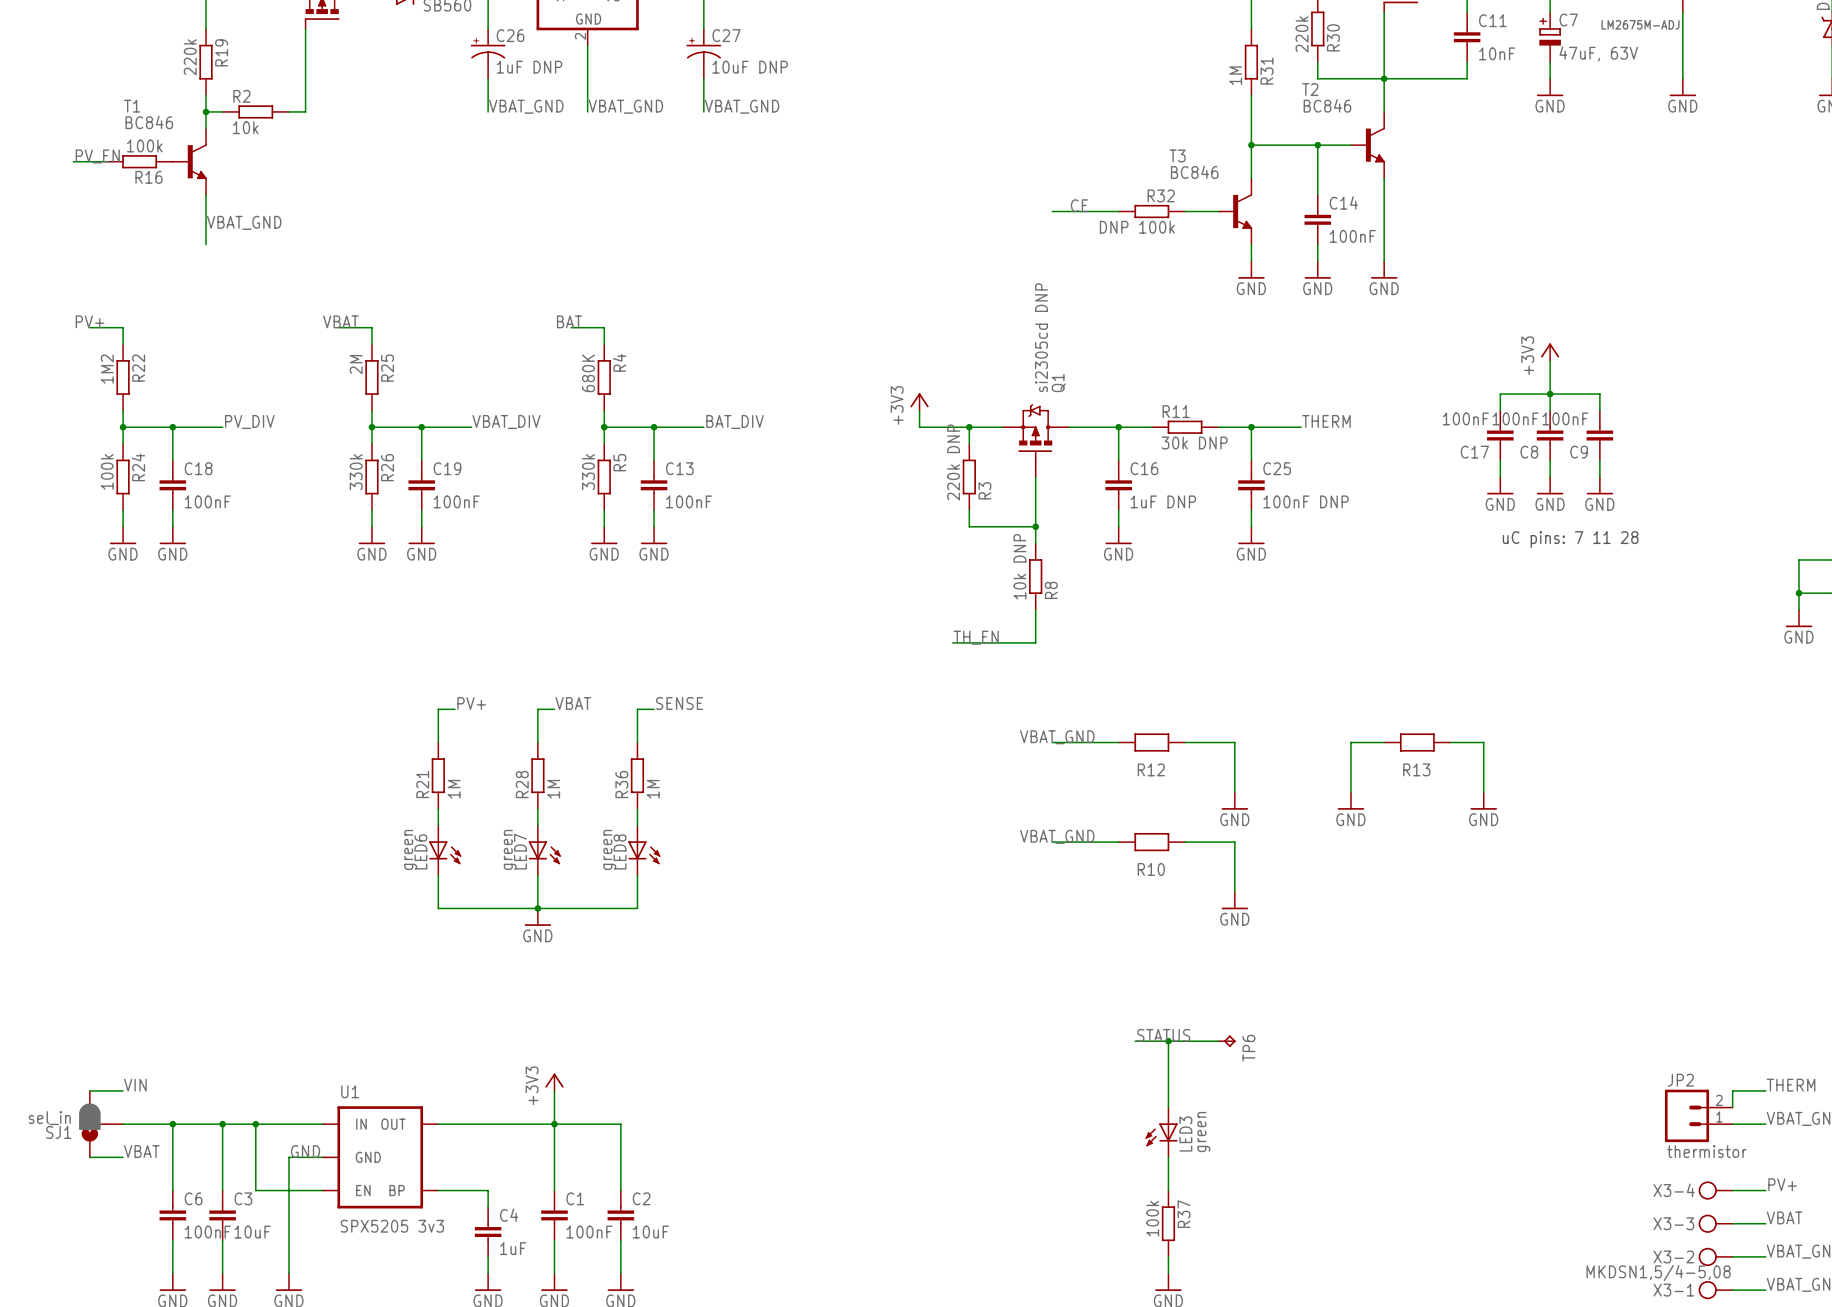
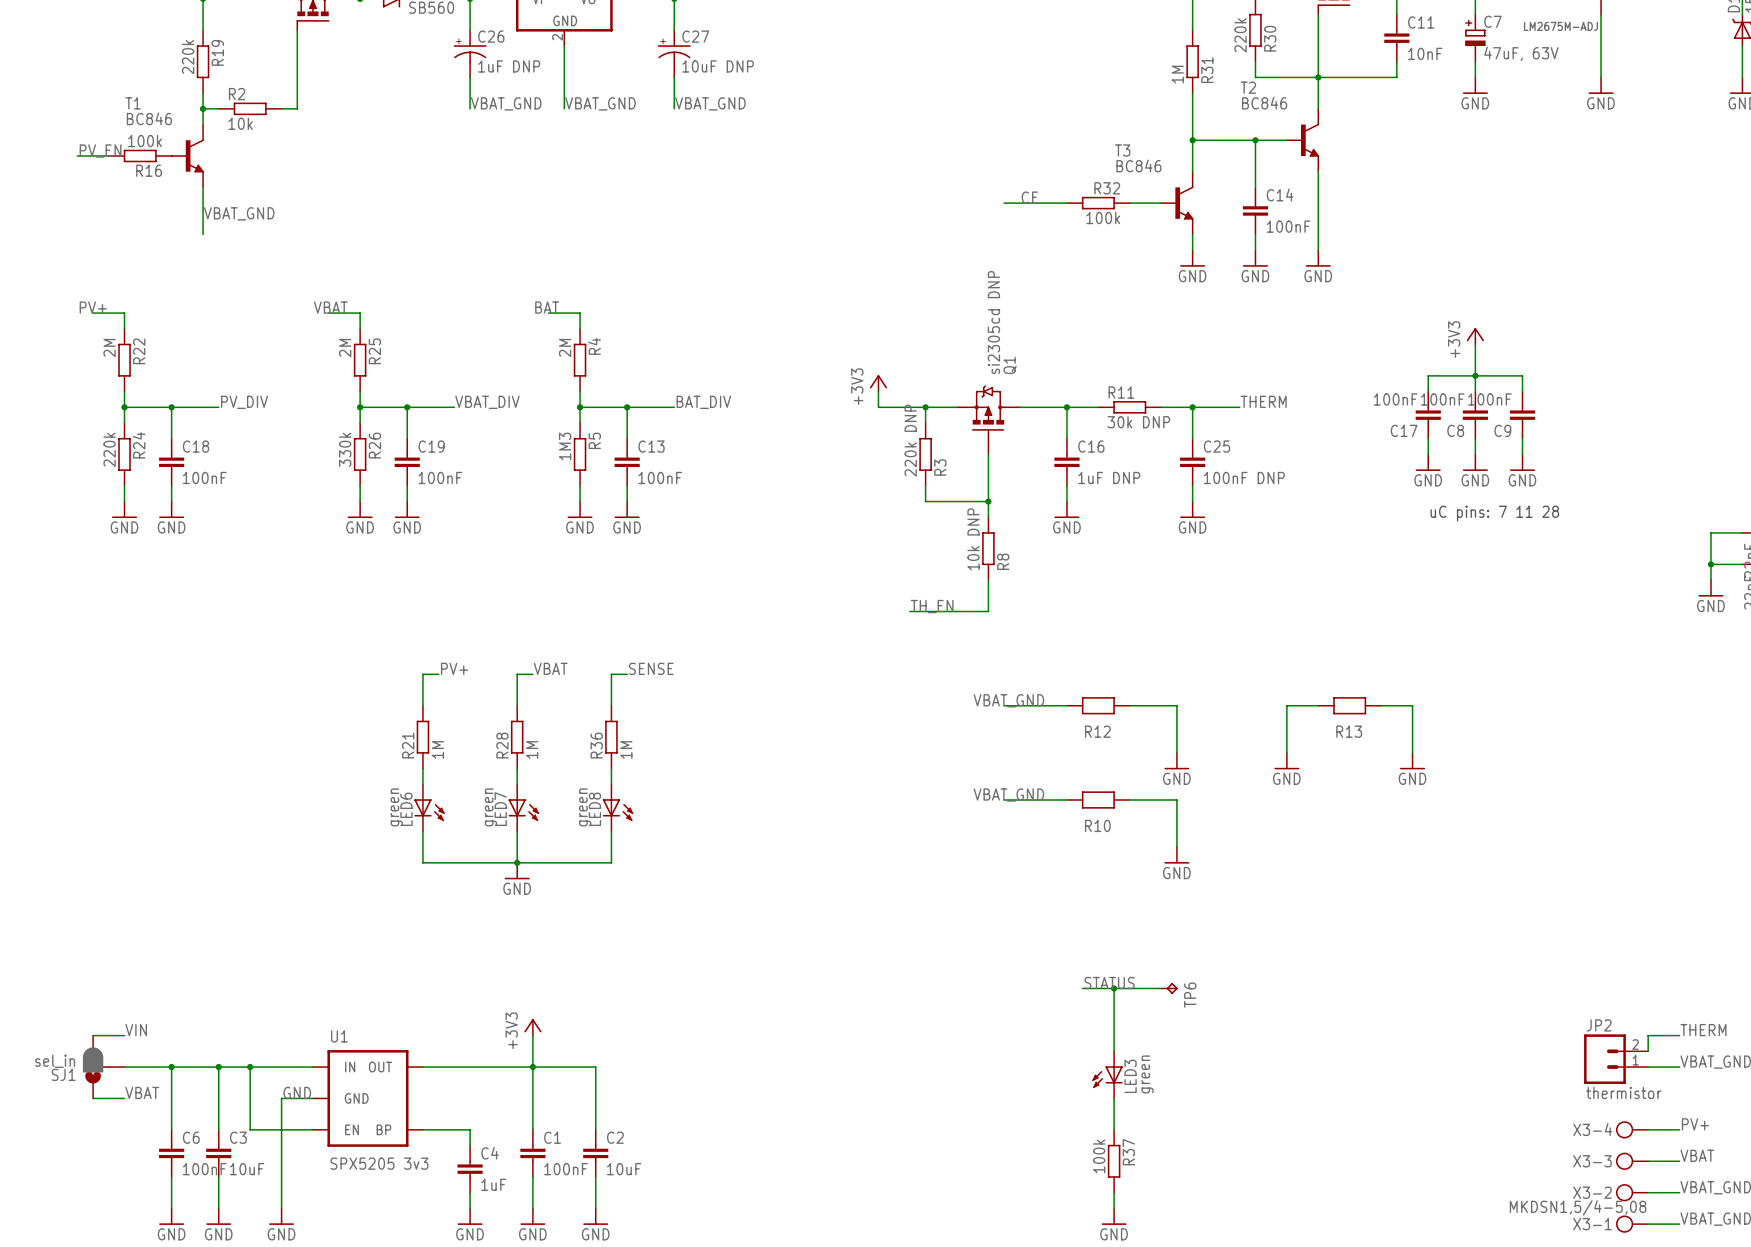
R32 value: DNP 100k (1137, 227) -> 100k (1103, 218)
R22 value: 1M2 (107, 369) -> 2M (109, 348)
R4 value: 680K (588, 373) -> 2M (565, 348)
R24 value: 100k (107, 471) -> 220k (109, 449)
R5 value: 330k (588, 472) -> 1M3 (565, 446)

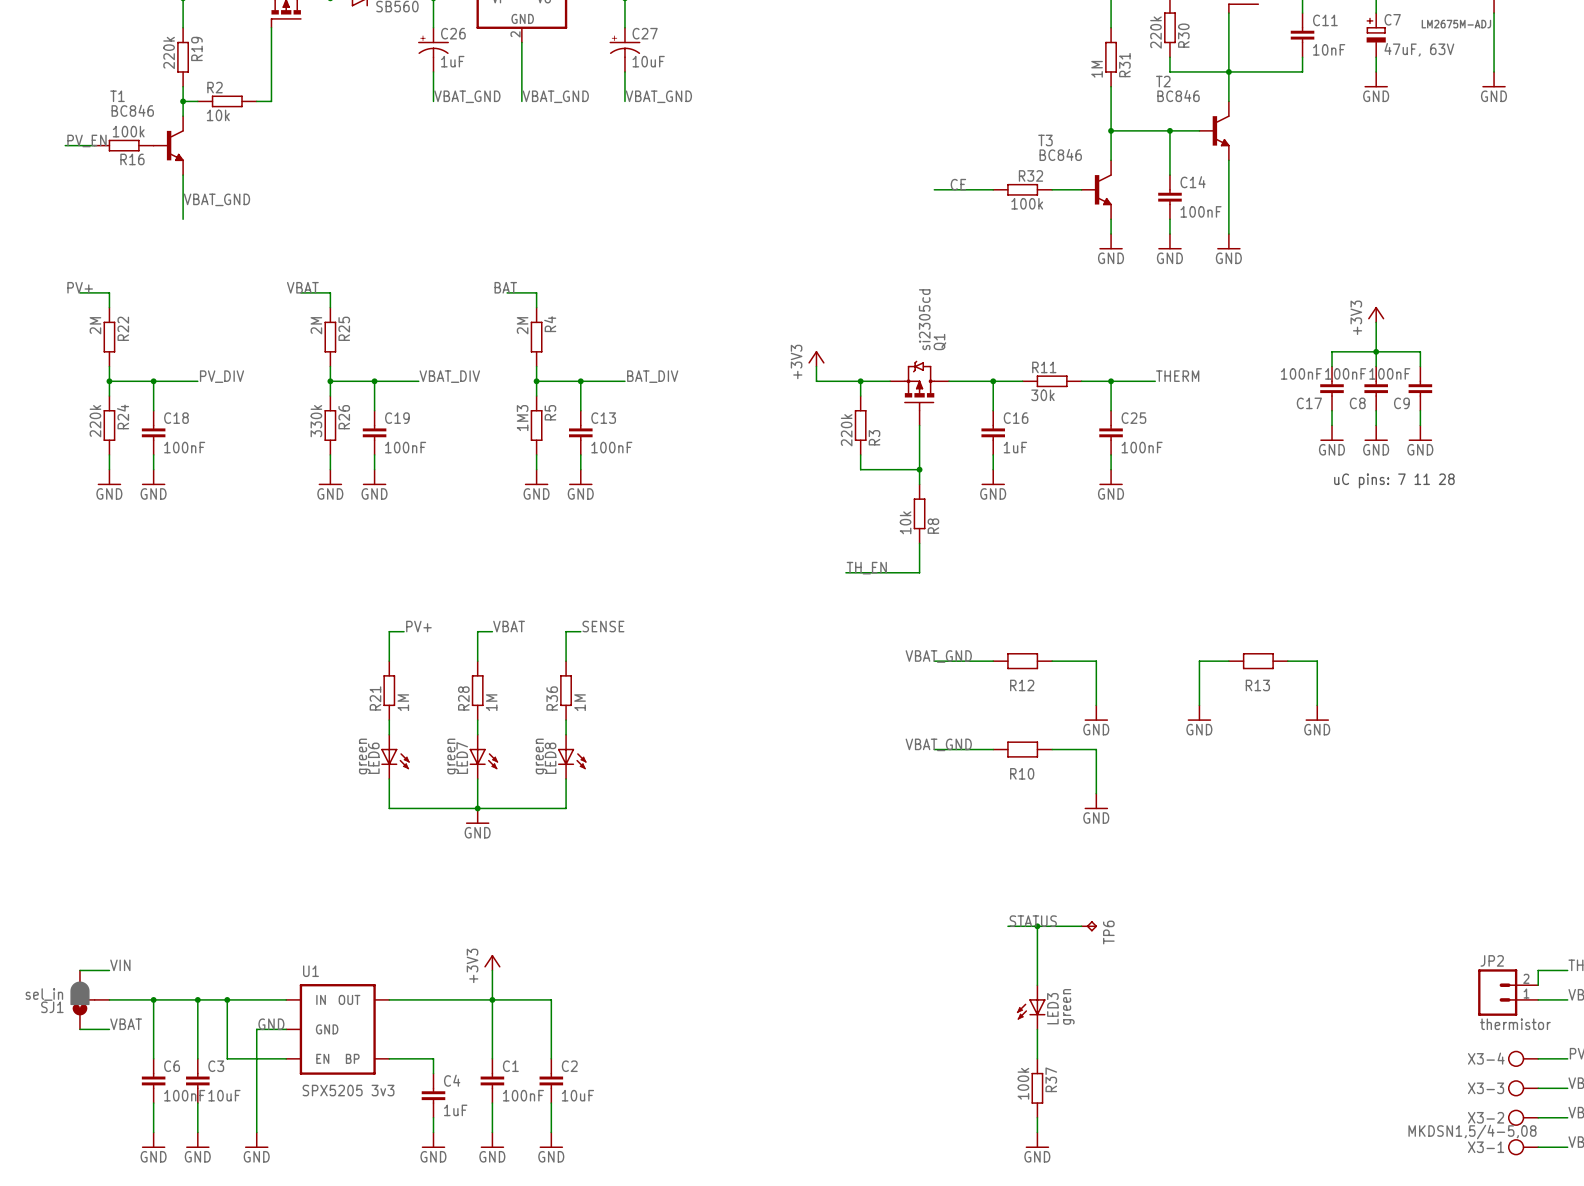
C26 value: 1uF DNP (509, 66) -> 1uF (452, 61)
C27 value: 10uF DNP (718, 66) -> 10uF (648, 61)
Q1 value: si2305cd DNP (993, 322) -> si2305cd (924, 319)
R11 value: 30k DNP (1138, 422) -> 30k (1042, 395)
R3 value: 220k DNP (910, 440) -> 220k (846, 430)
C16 value: 1uF DNP (1109, 477) -> 1uF (1015, 447)
C25 value: 100nF DNP (1244, 477) -> 100nF (1142, 447)
R8 value: 10k DNP (973, 539) -> 10k (905, 522)

